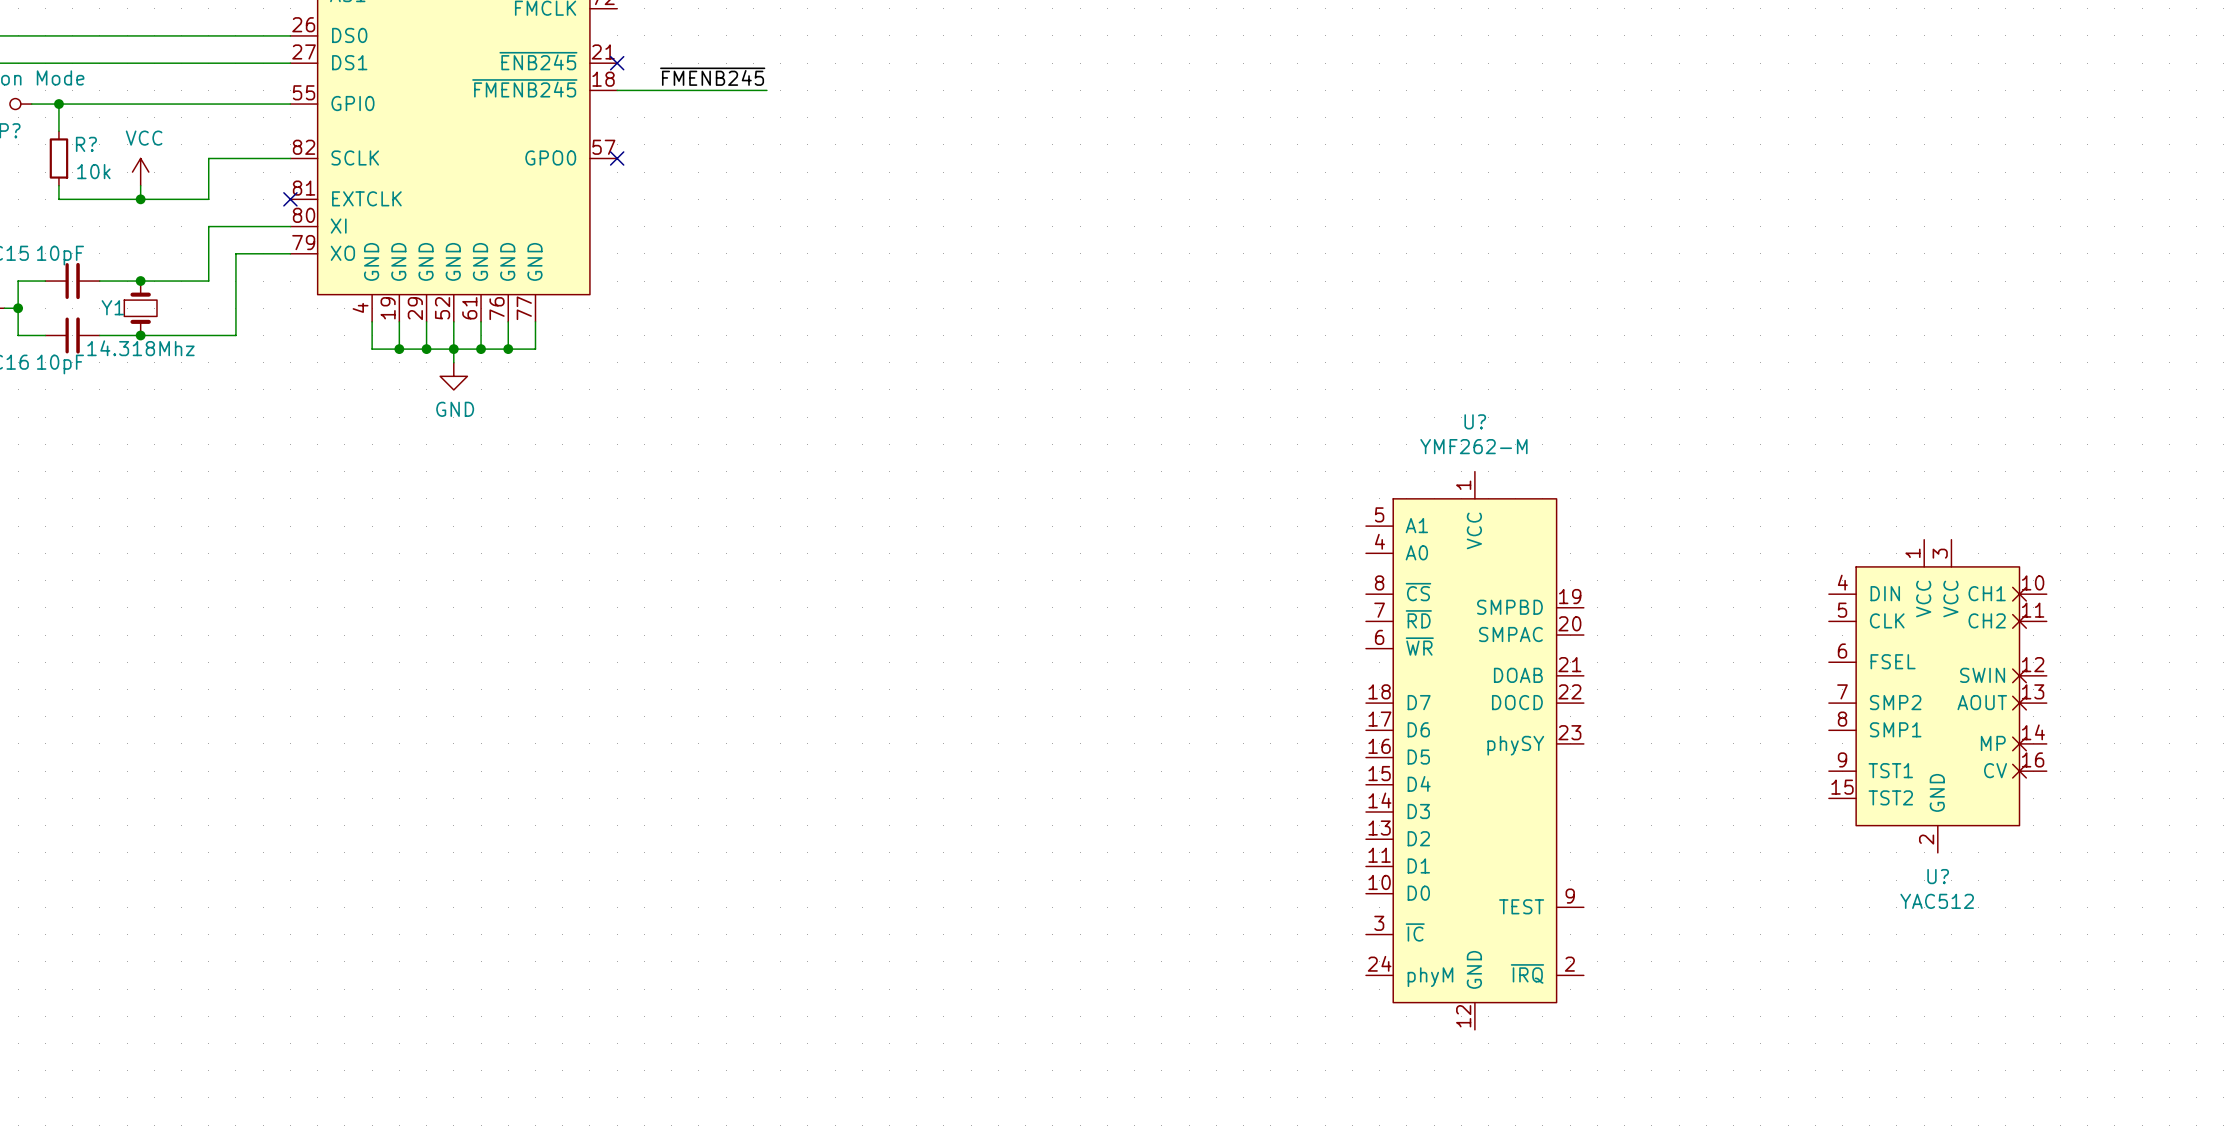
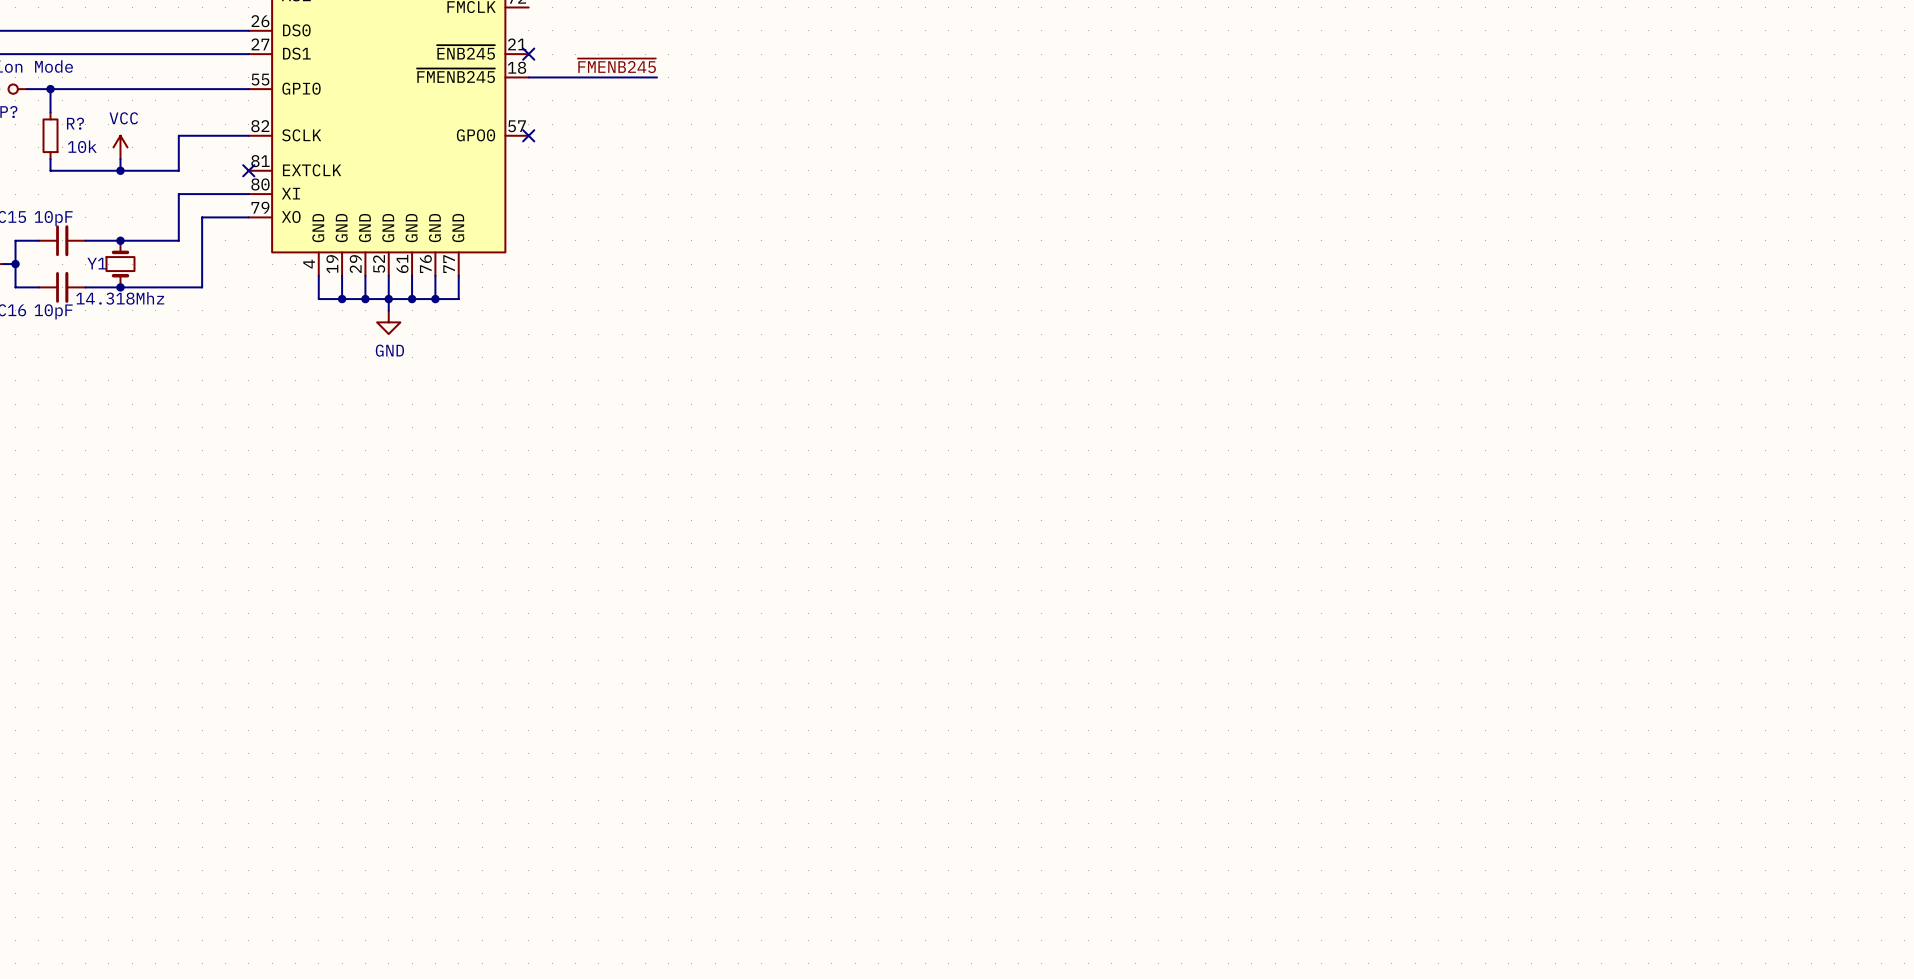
U?: YAC512 (1937, 696) -> none
U?: YMF262-M (1474, 750) -> none

